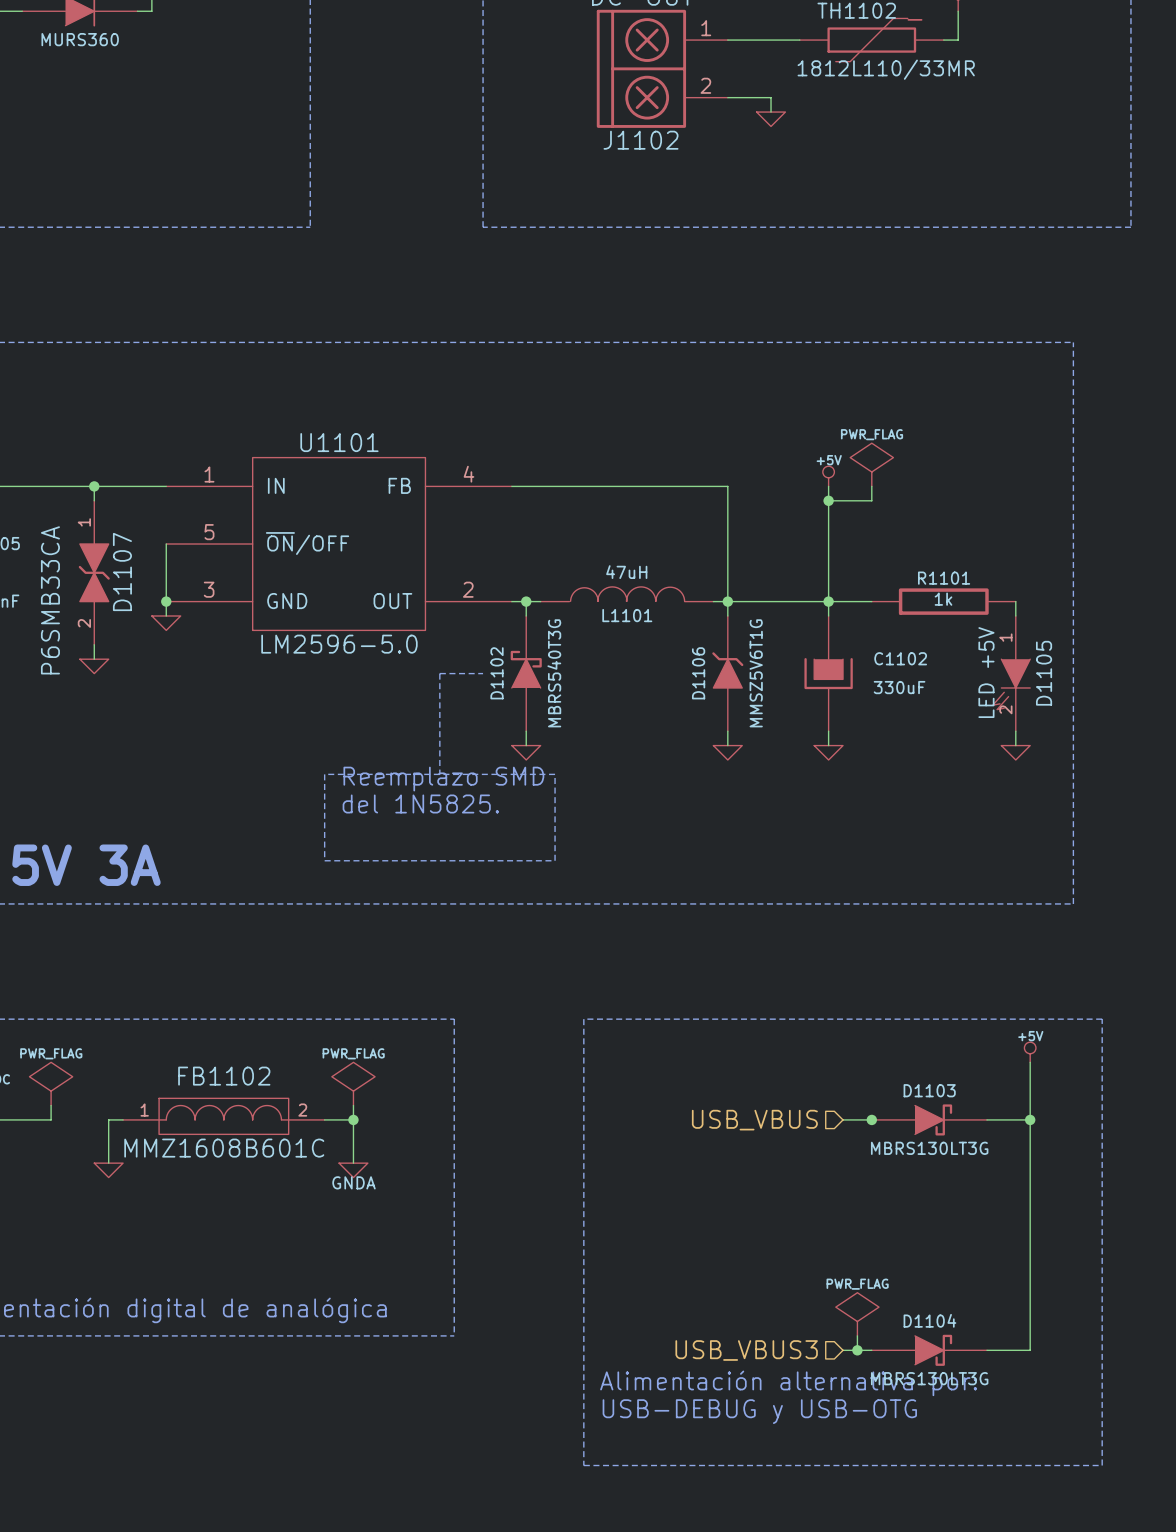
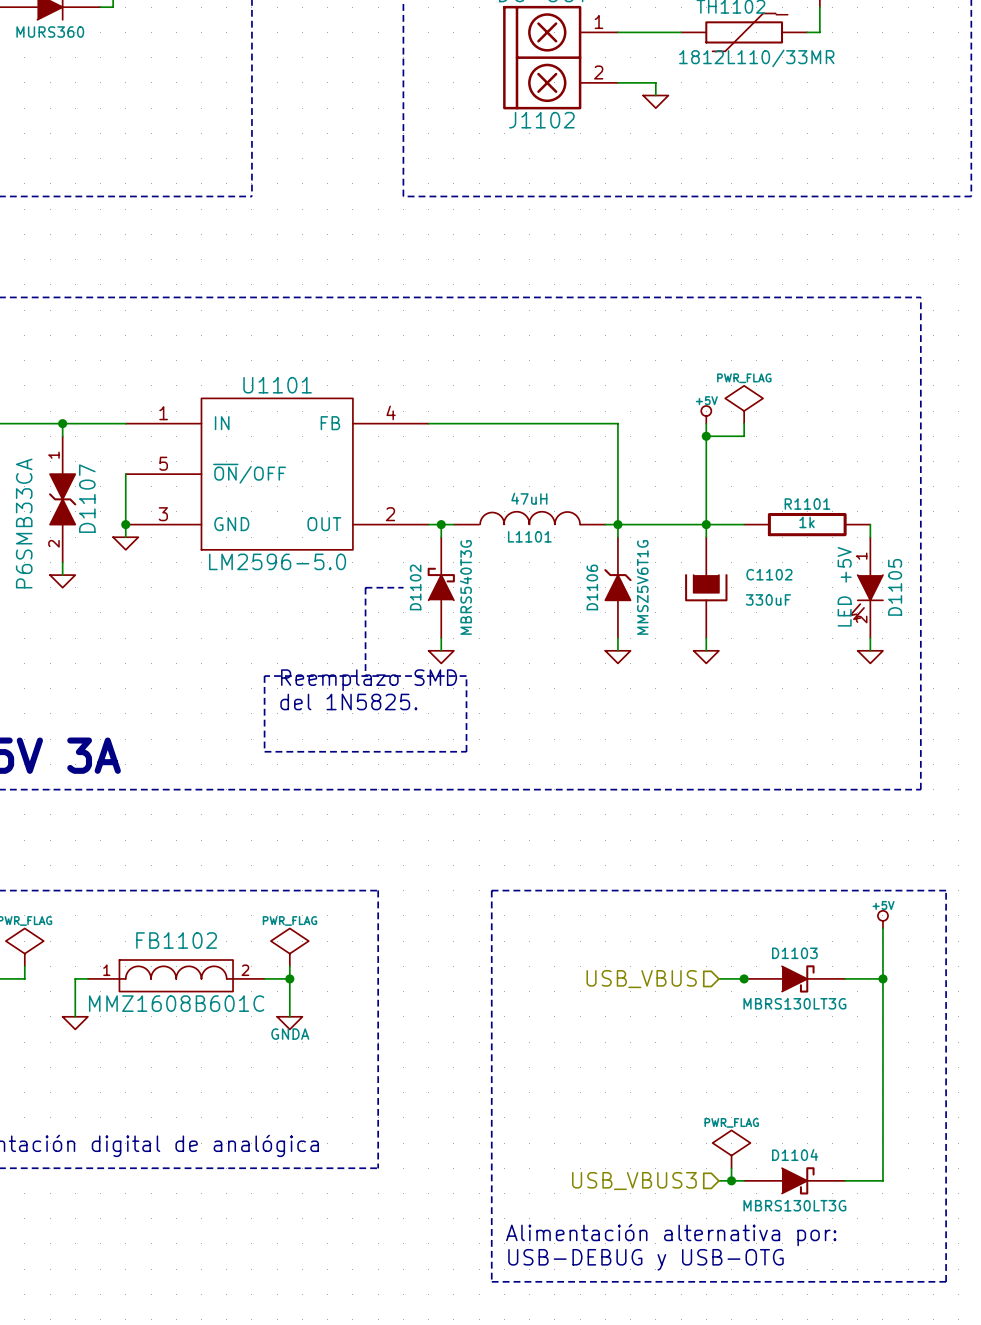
text: Alimentación alternativa por: (788, 1383) -> none
text: USB-DEBUG y USB-OTG (759, 1411) -> Alimentación alternativa por: (671, 1235)
text: none -> USB-DEBUG y USB-OTG (645, 1259)

